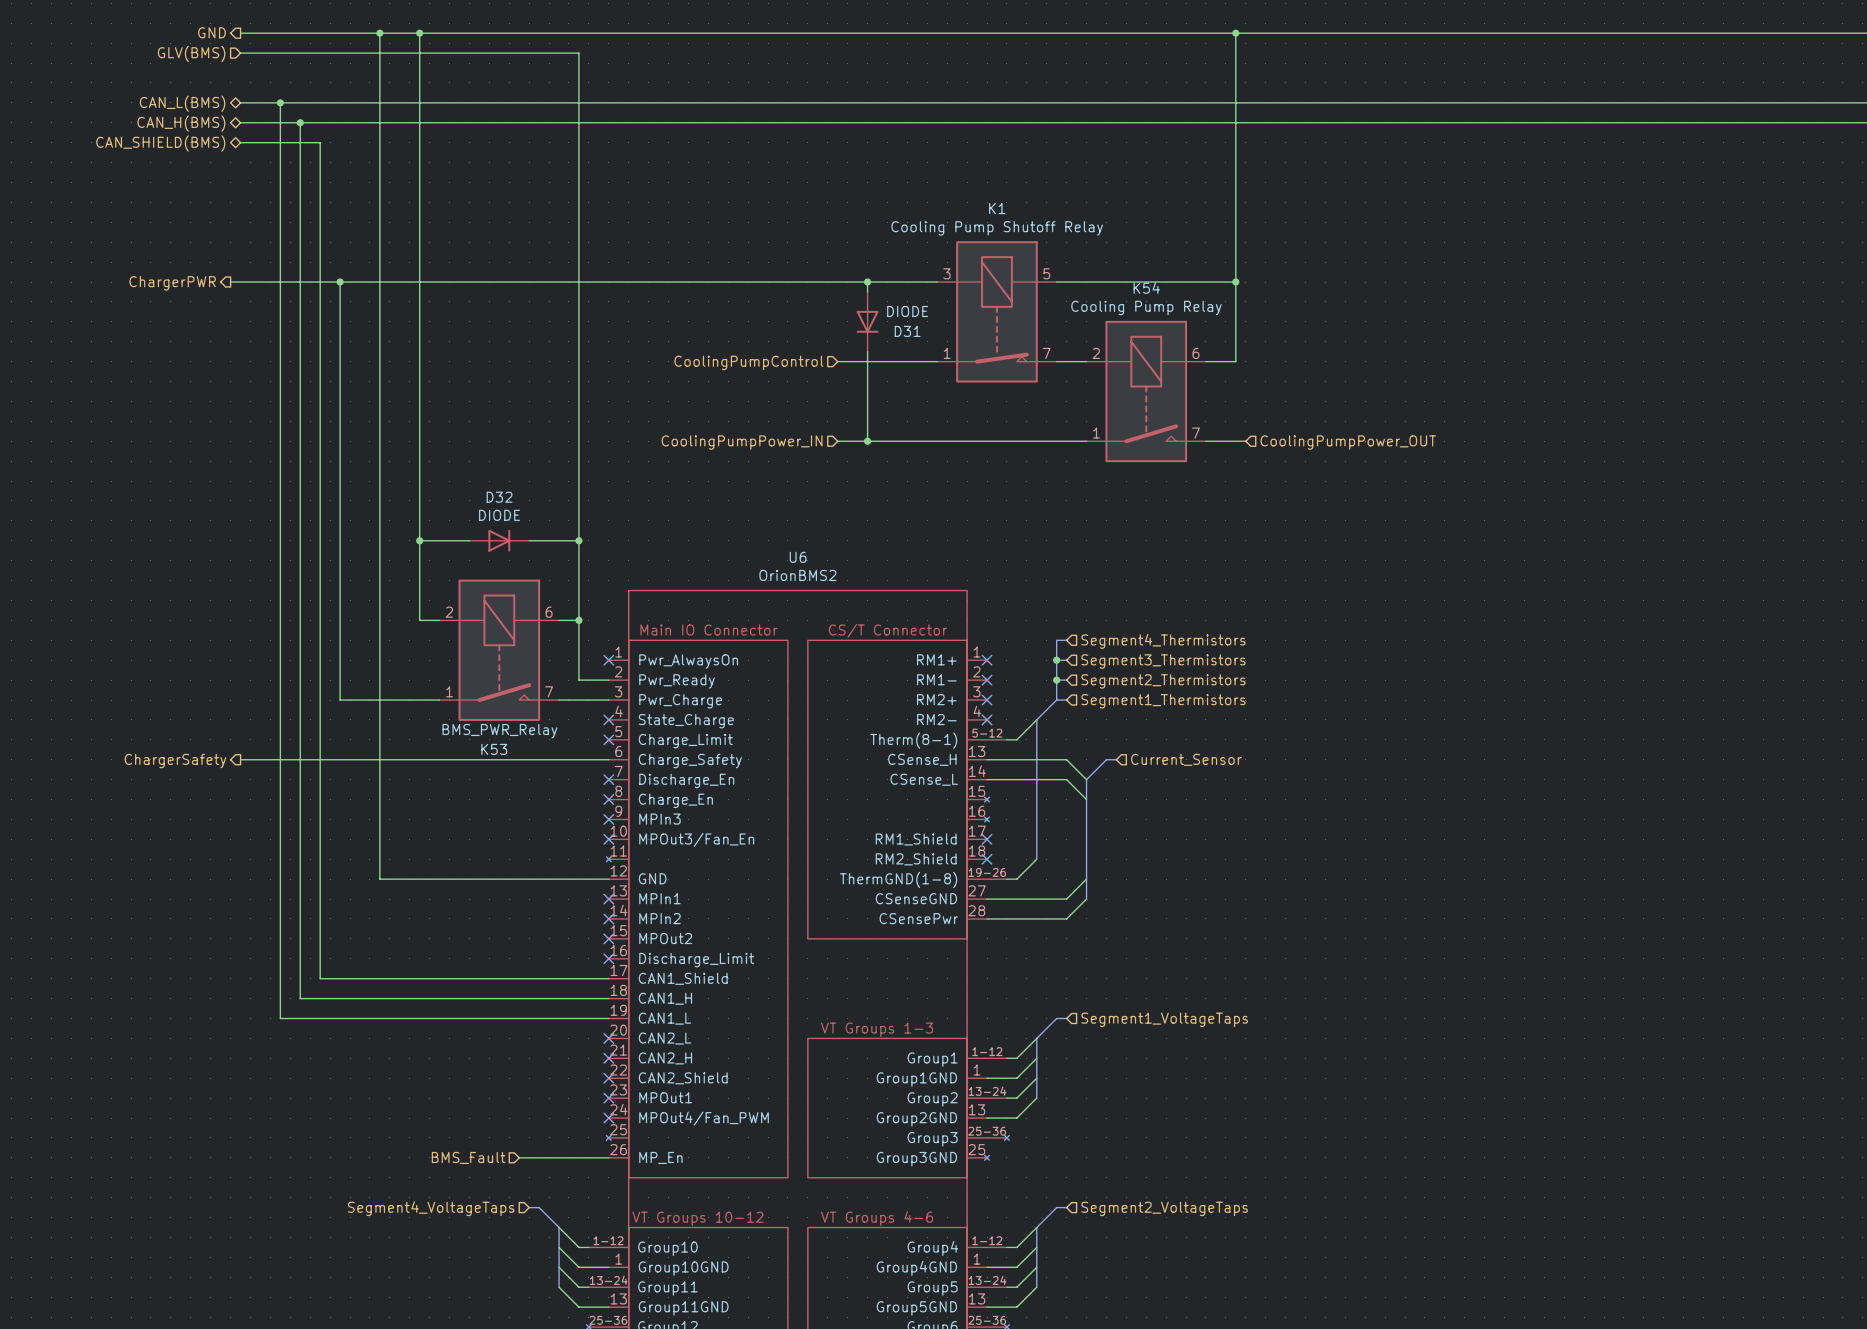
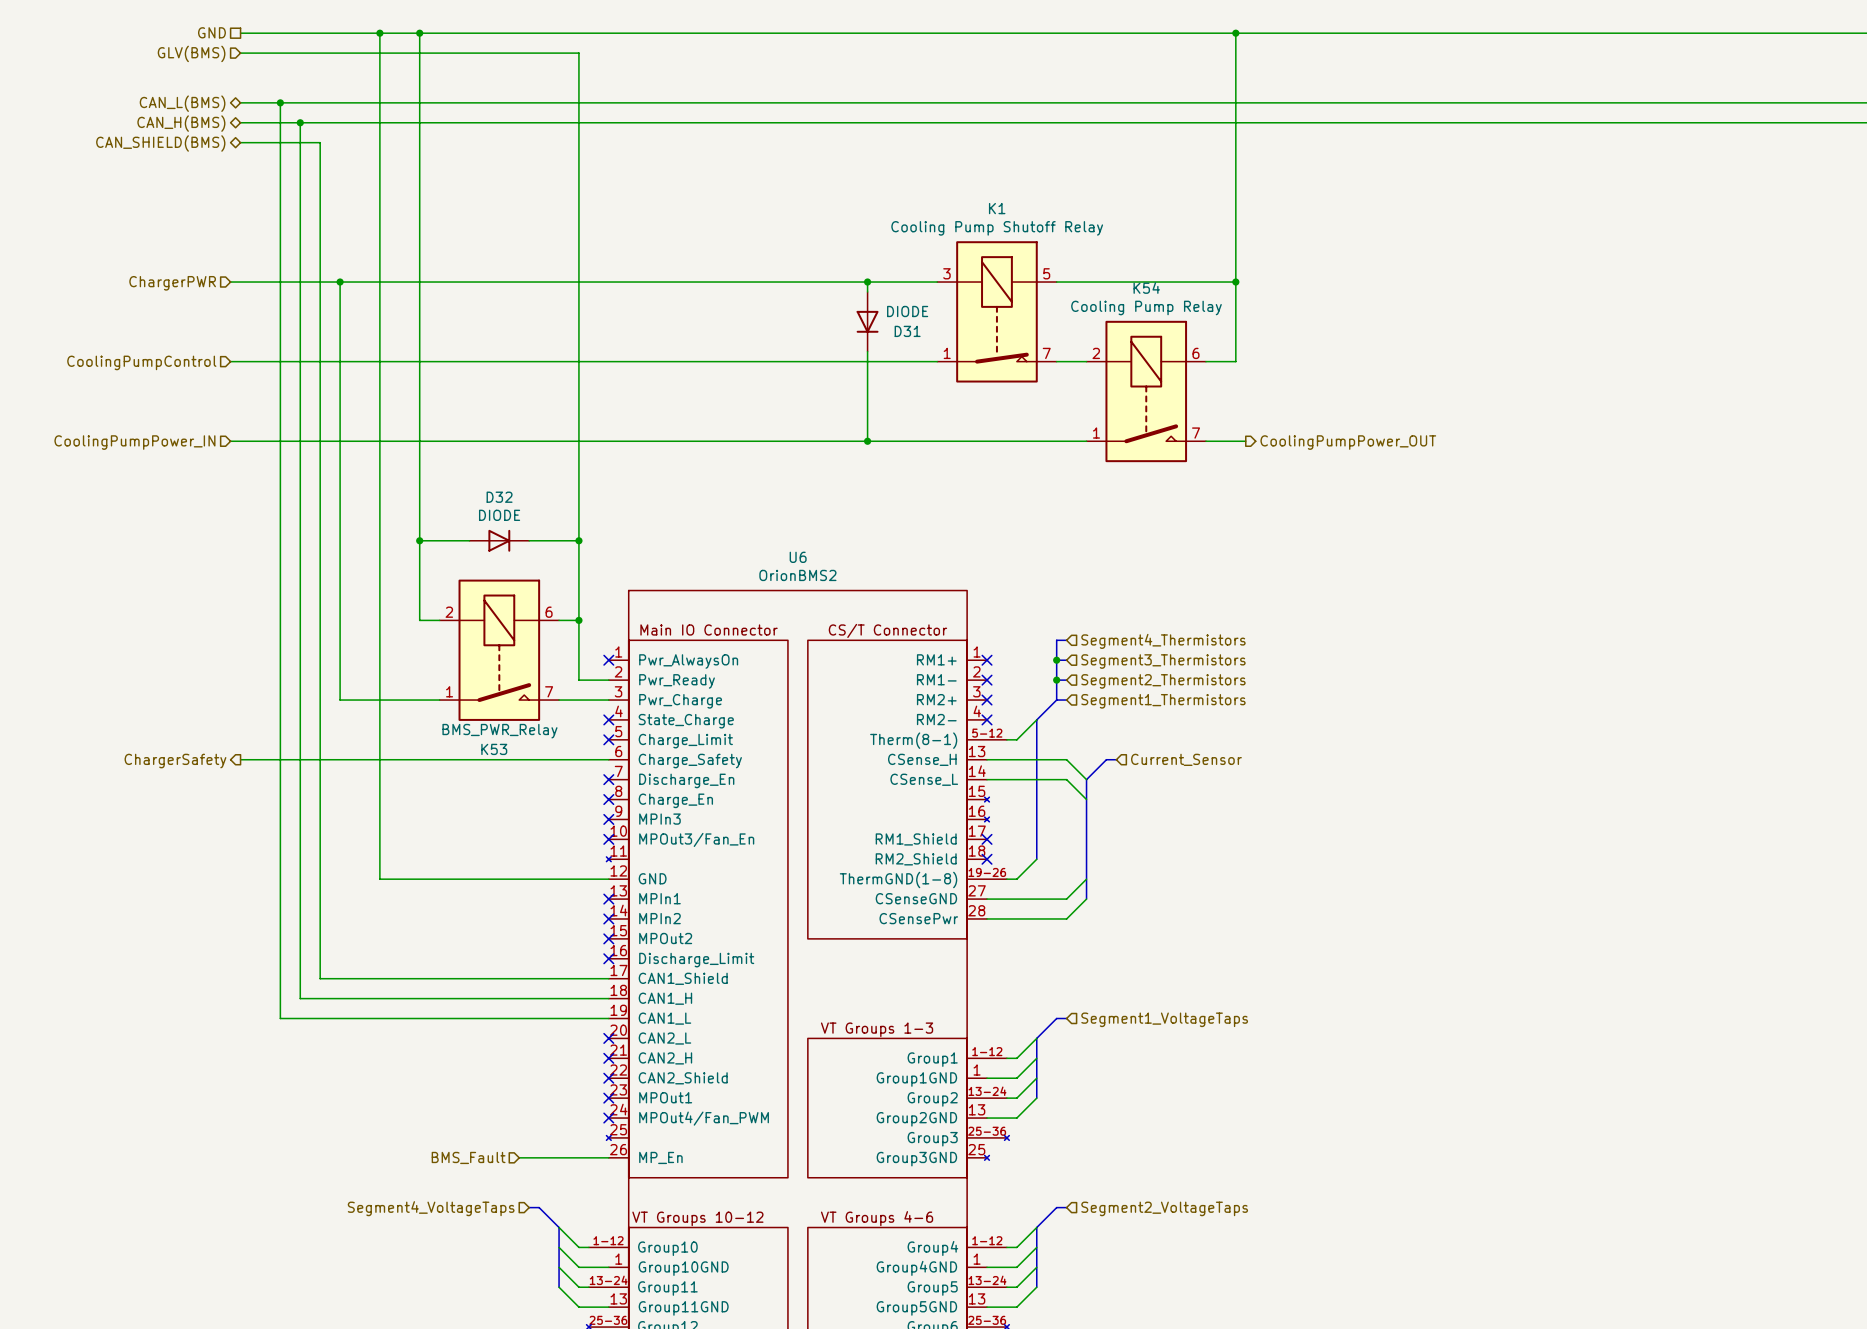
hierarchical label shape: output (211, 32) -> passive (211, 32)
hierarchical label shape: output (172, 283) -> input (172, 283)
wire: none -> (230, 361) (837, 361)
hierarchical label: none -> CoolingPumpControl (141, 362)
hierarchical label: CoolingPumpControl (748, 362) -> none
wire: none -> (230, 441) (837, 441)
hierarchical label: none -> CoolingPumpPower_IN (134, 442)
hierarchical label: CoolingPumpPower_IN (742, 442) -> none
hierarchical label shape: input (1348, 442) -> output (1348, 442)

